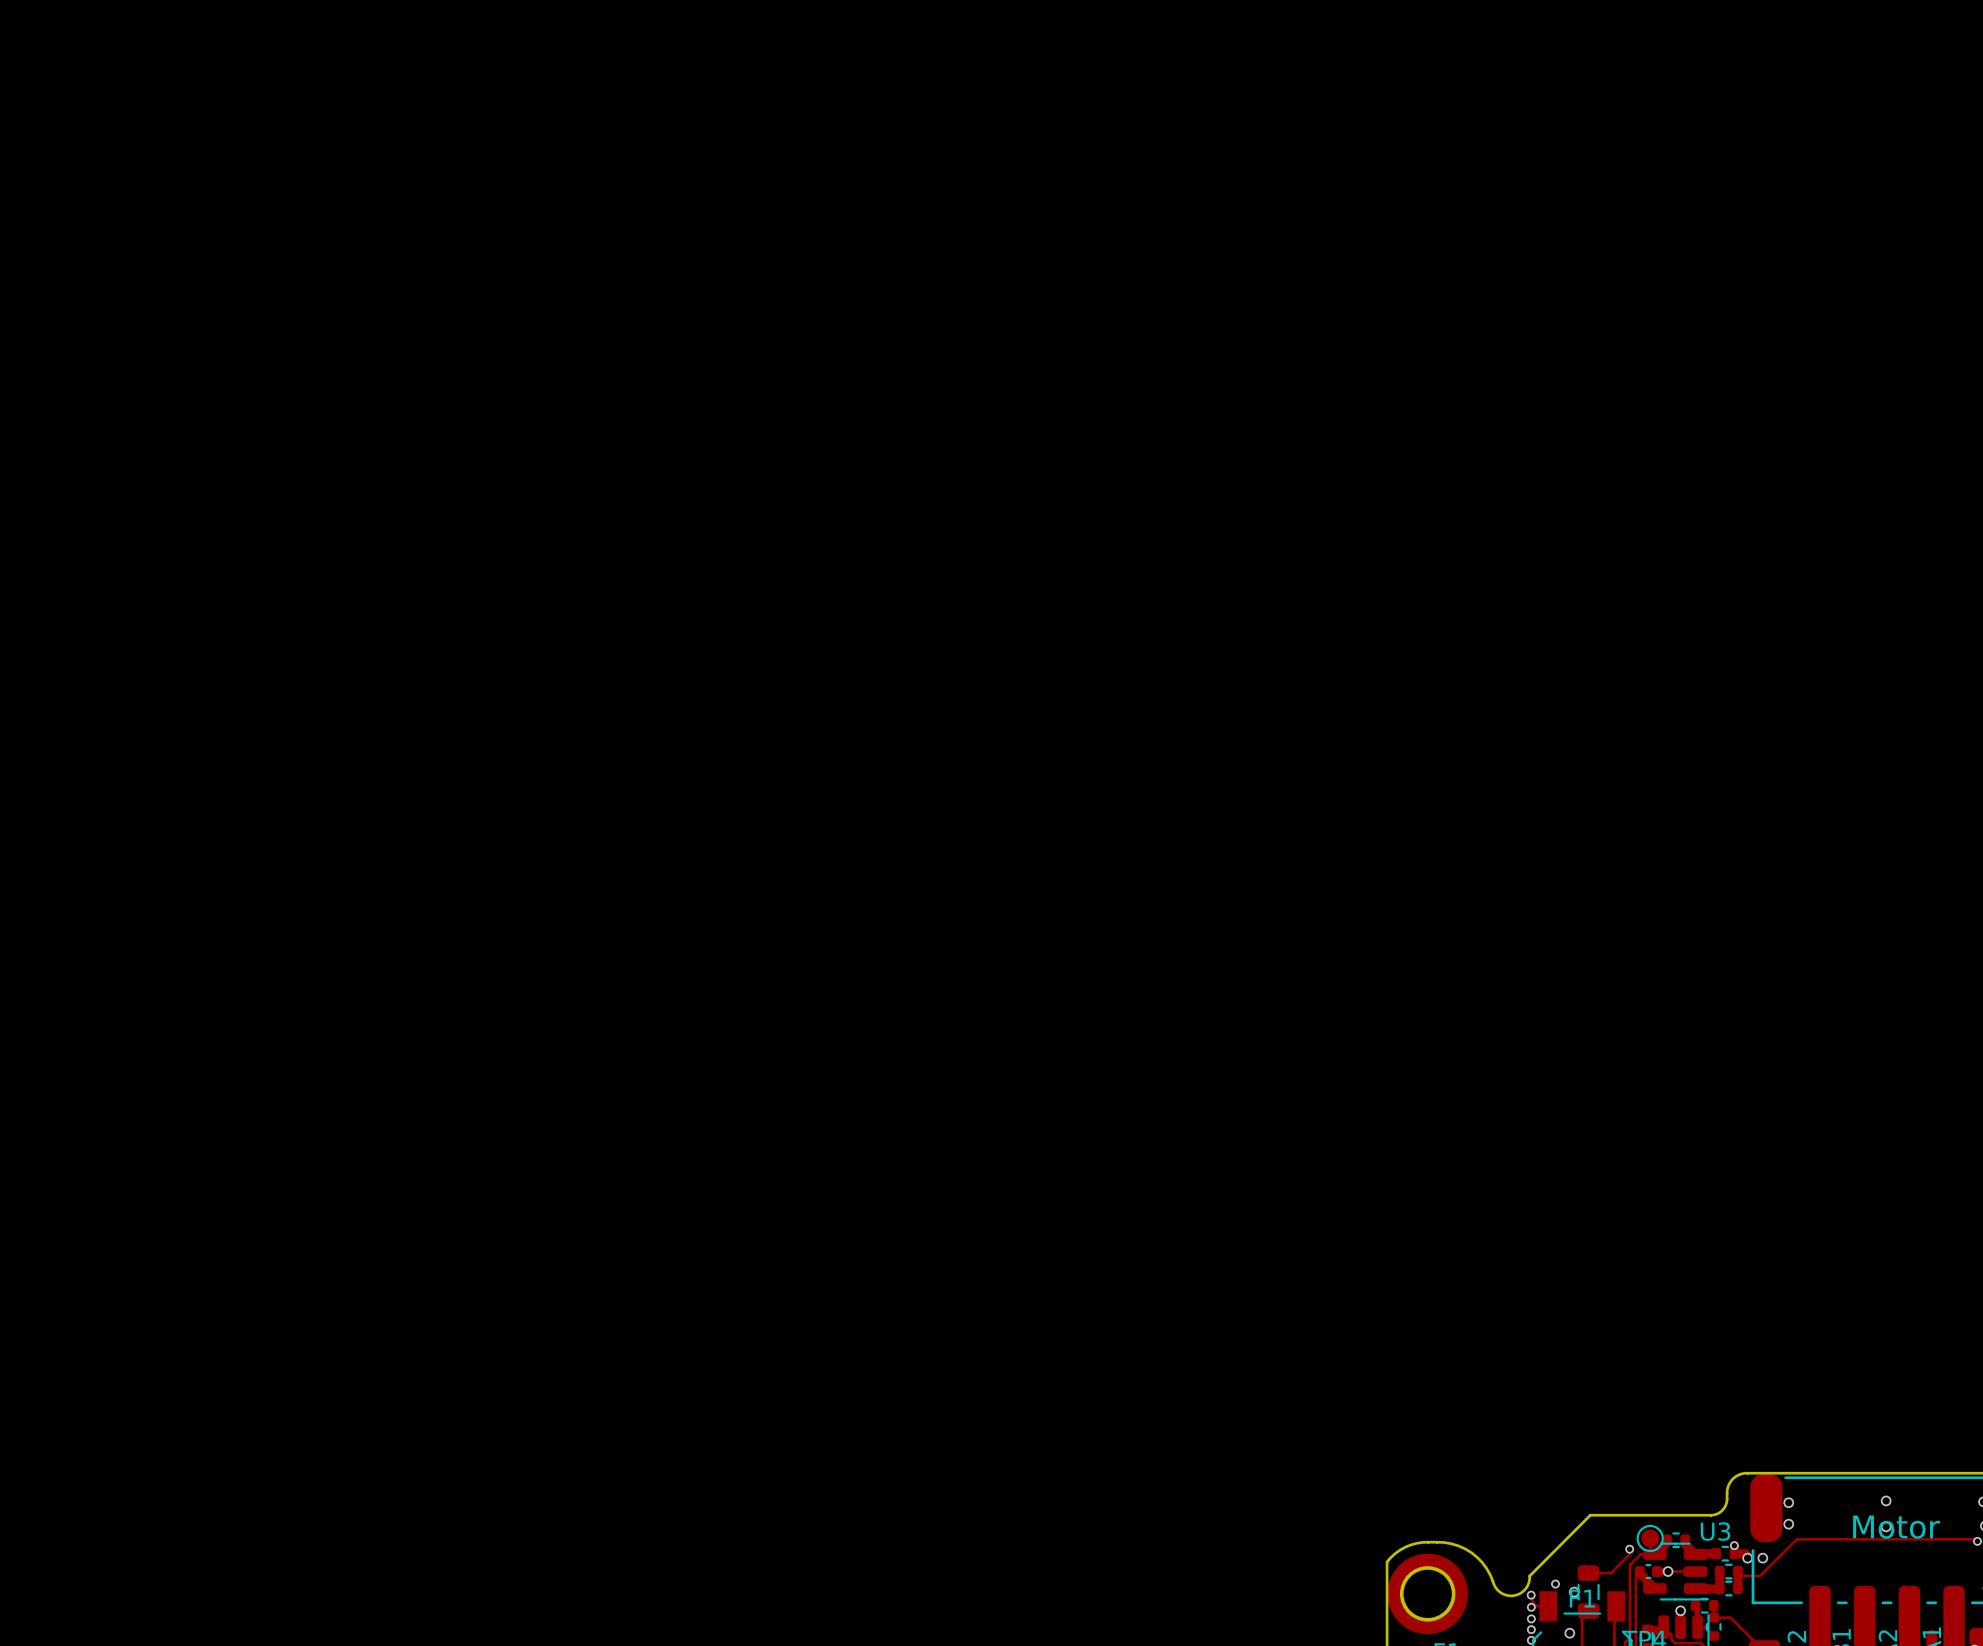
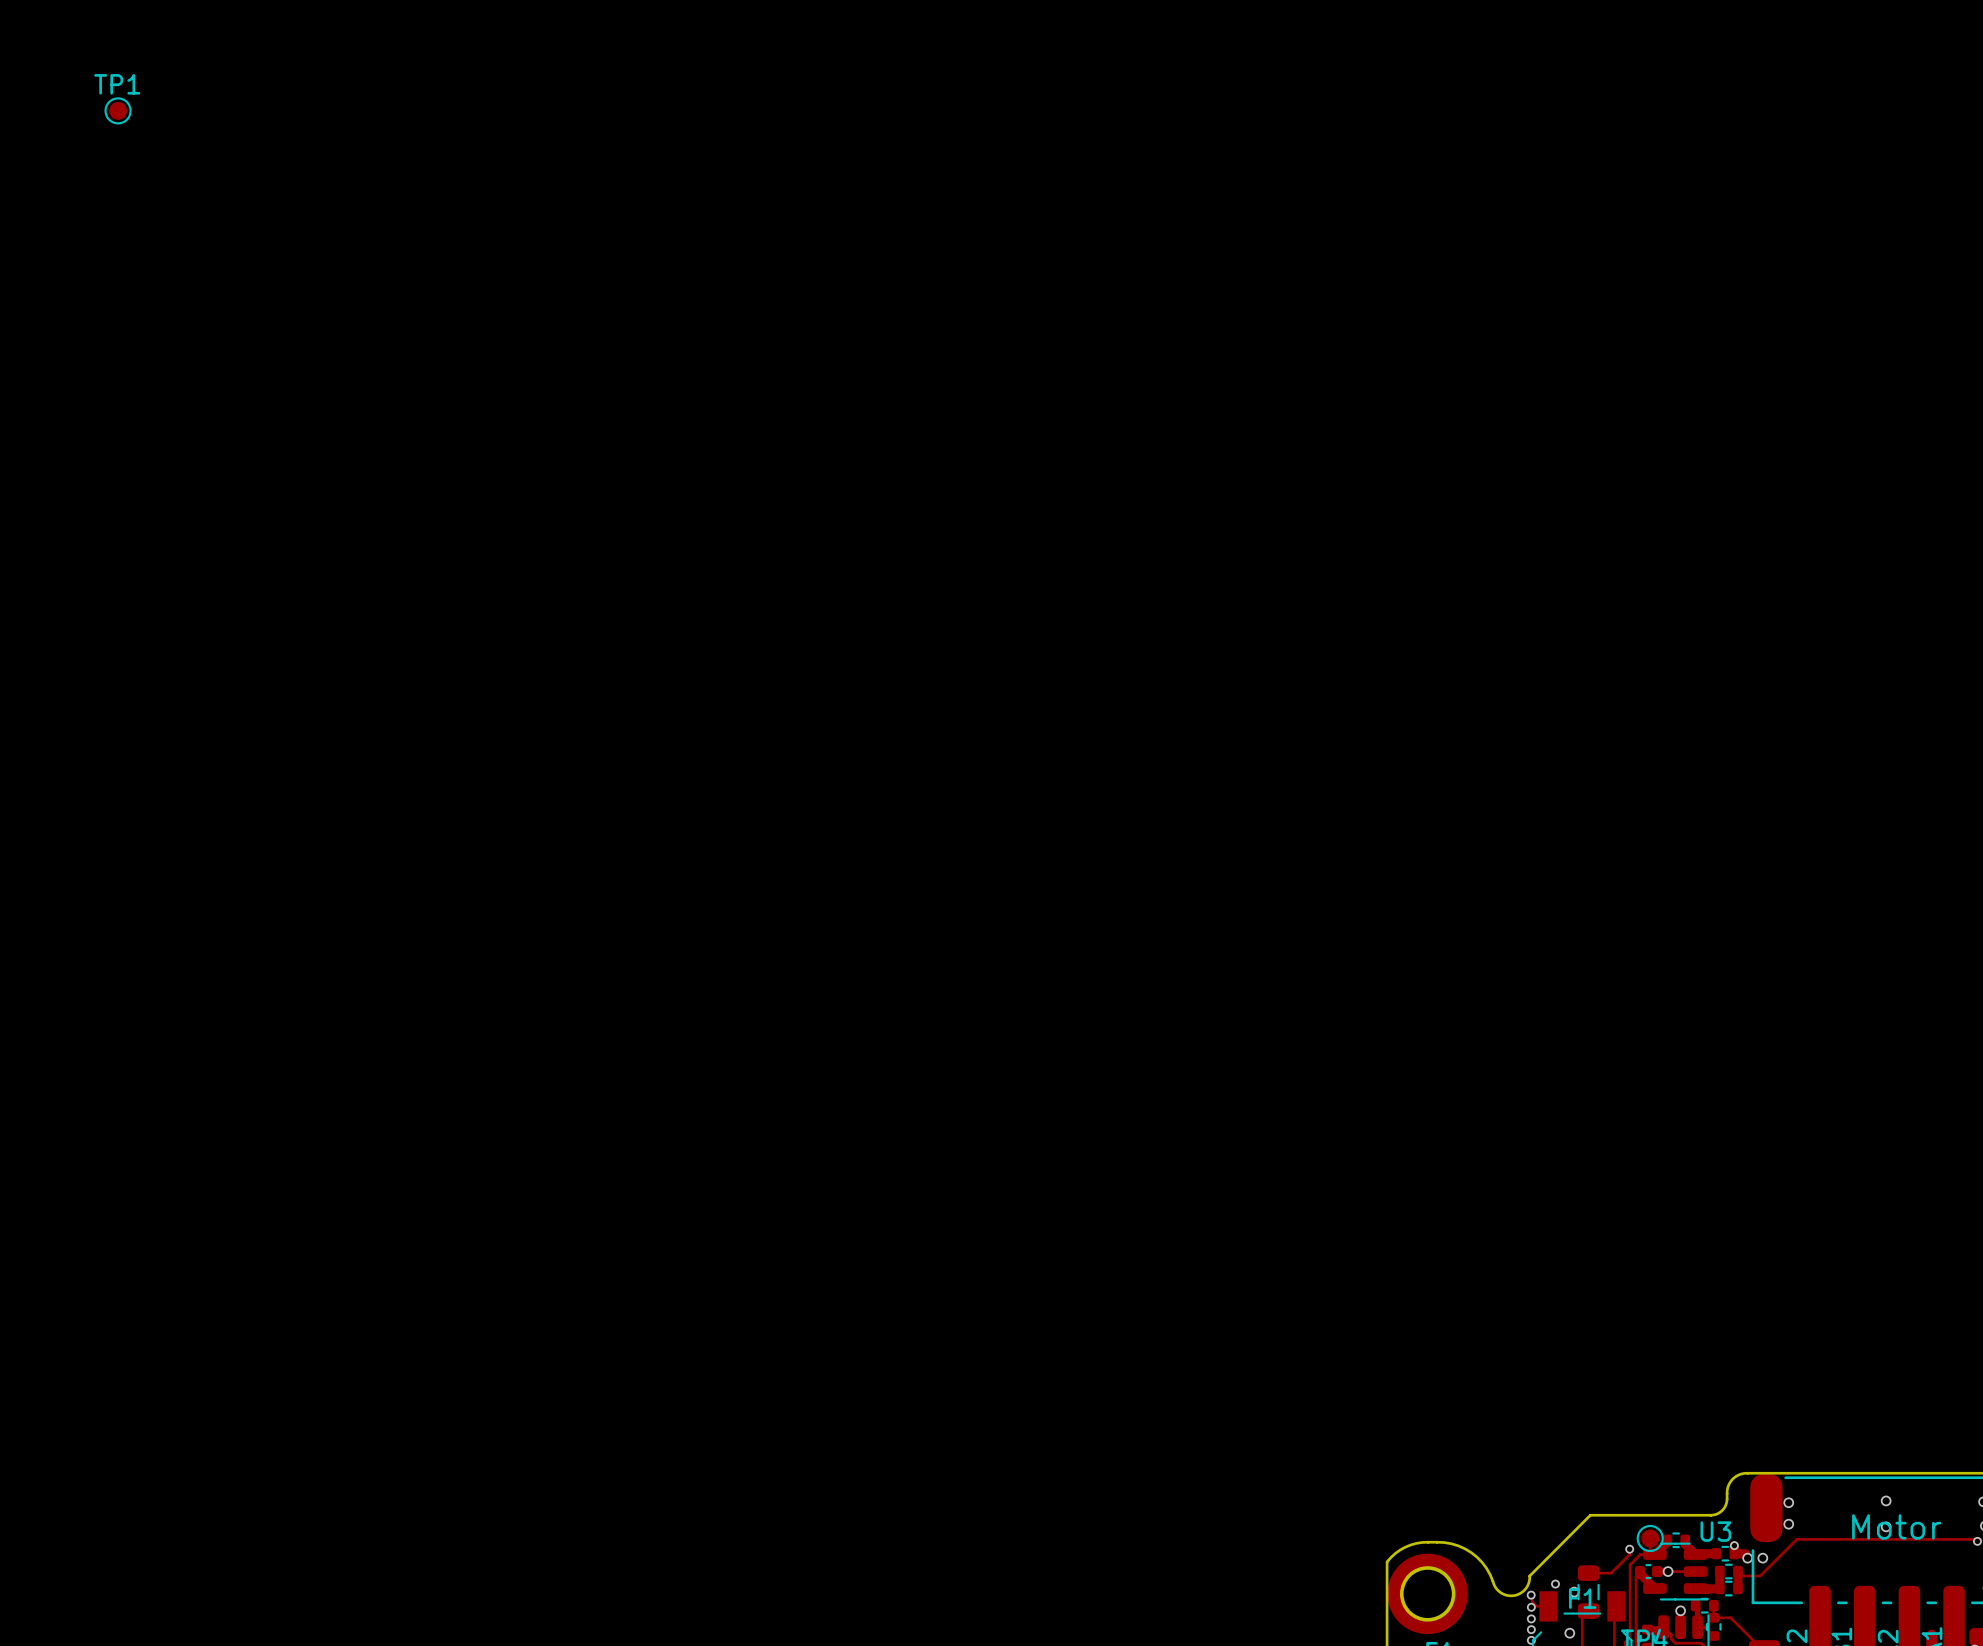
TP1: none -> (118, 110)

